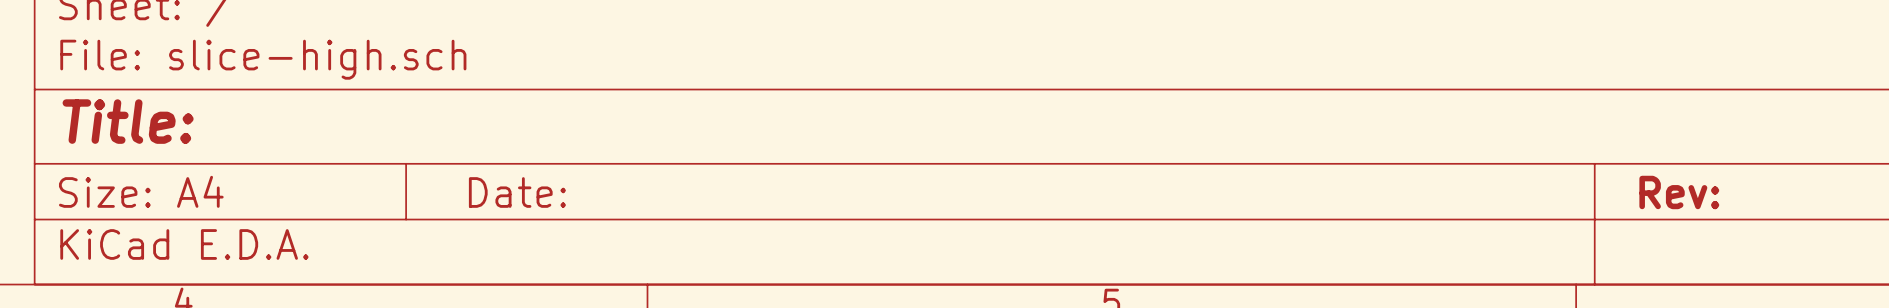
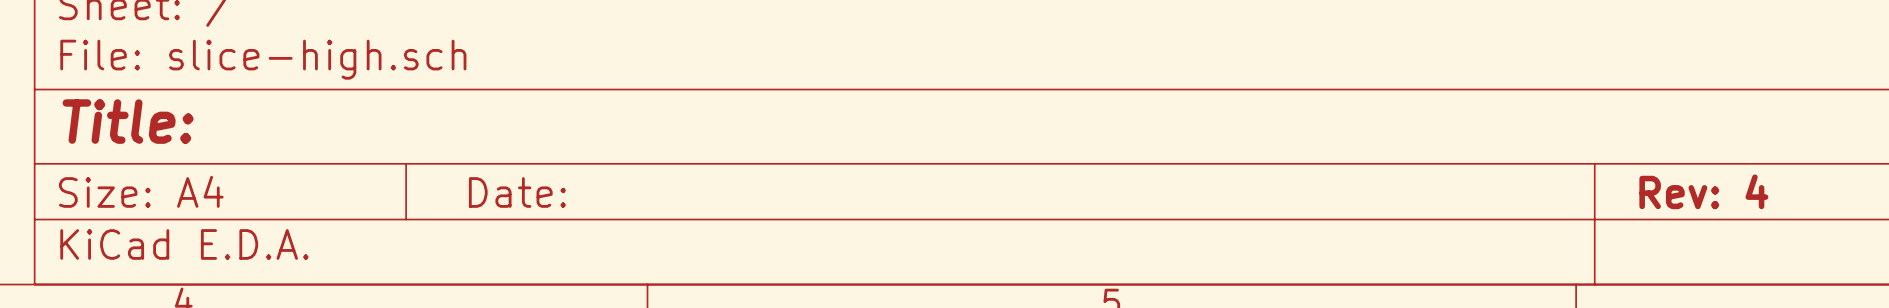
title block: Rev: (1679, 192) -> Rev: 4 (1703, 191)

